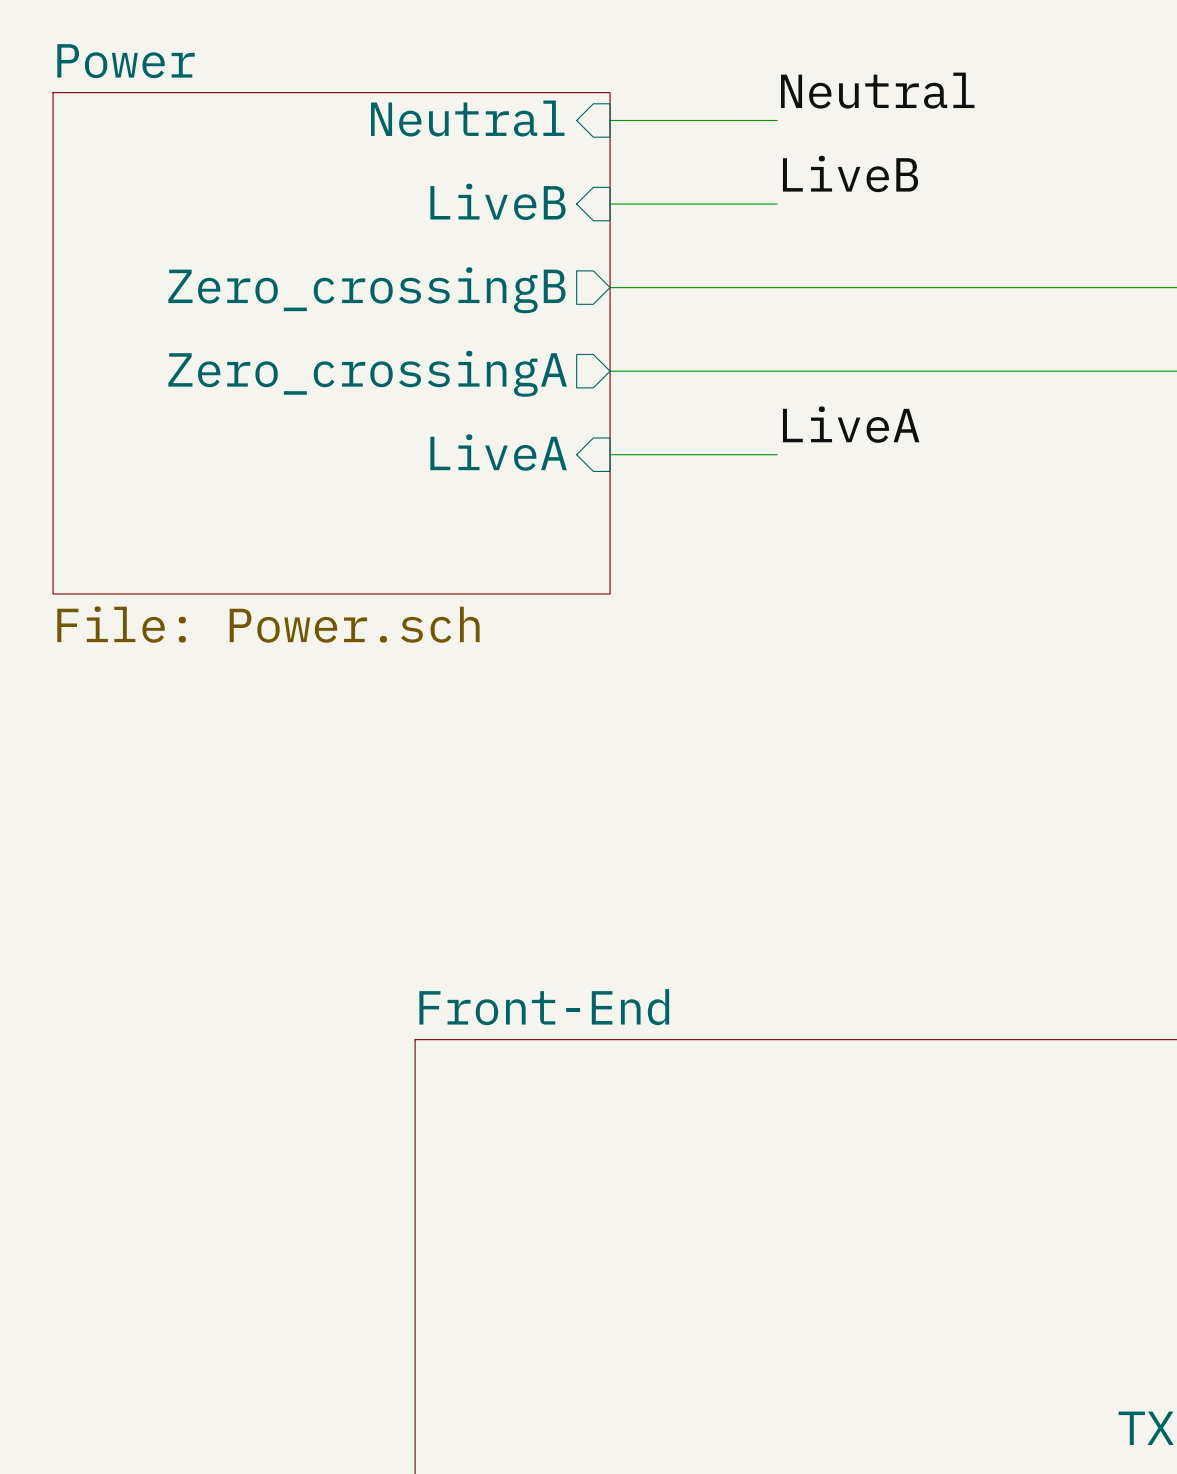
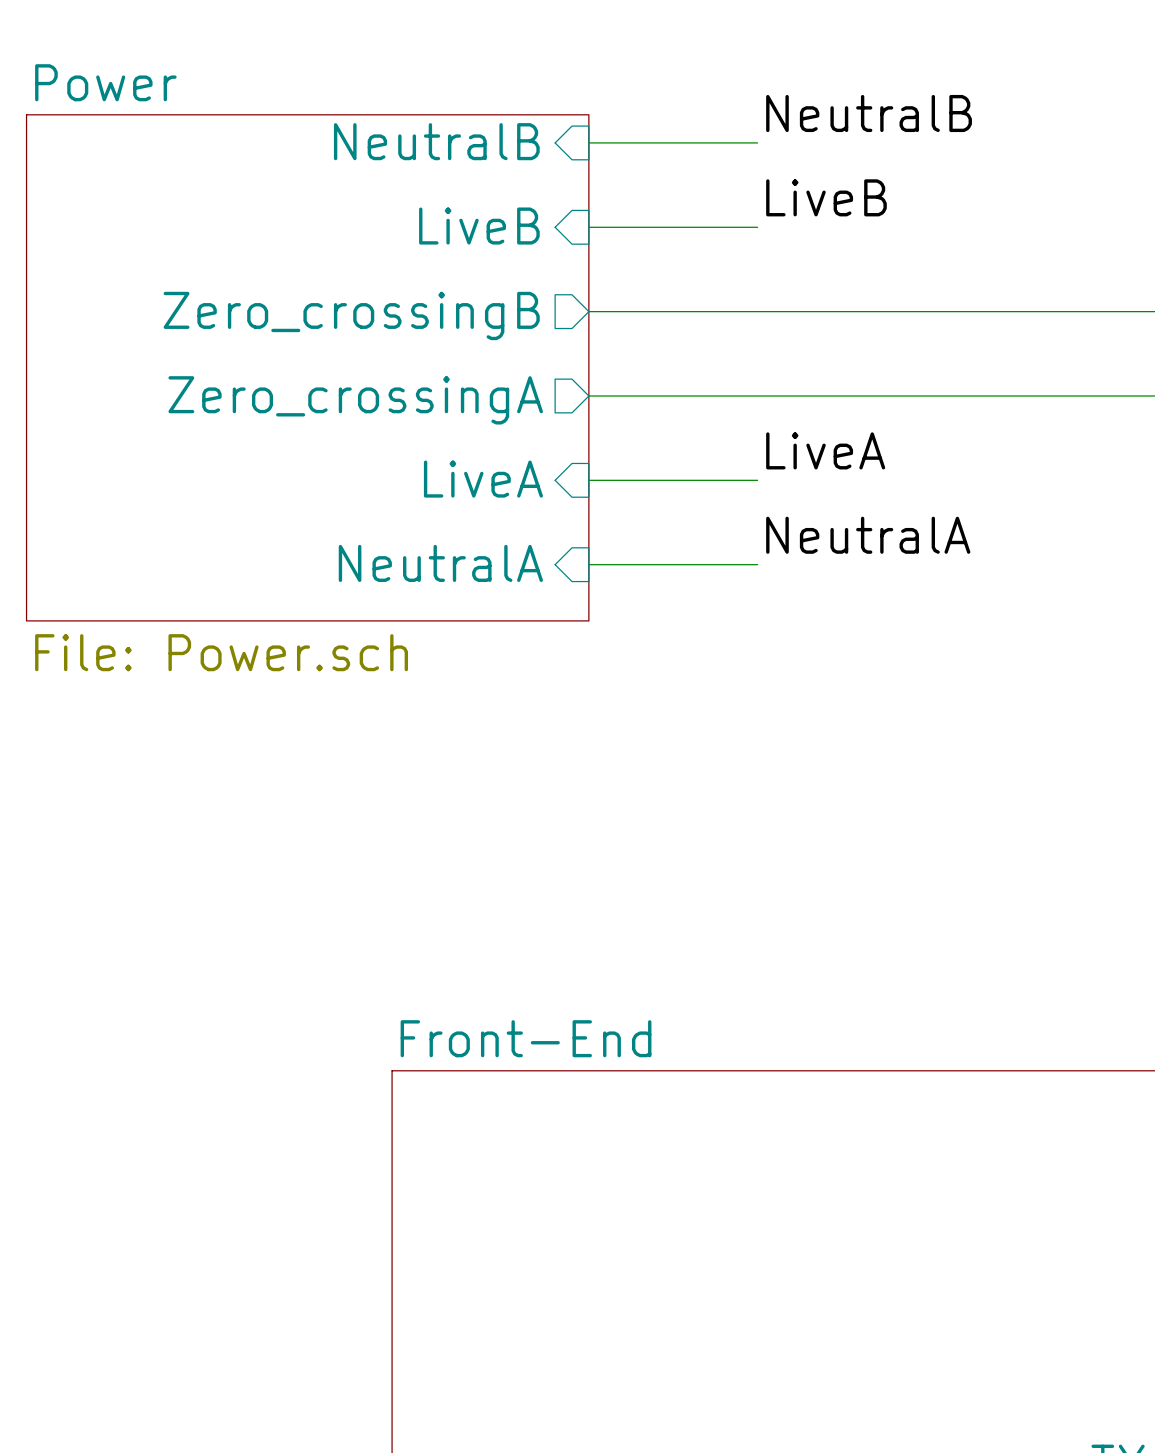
label: Neutral (877, 90) -> NeutralB (869, 113)
sheet pin: Neutral (467, 118) -> NeutralB (436, 141)
label: none -> NeutralA (868, 535)
sheet pin: none -> NeutralA (440, 563)
wire: none -> (588, 564) (757, 564)

